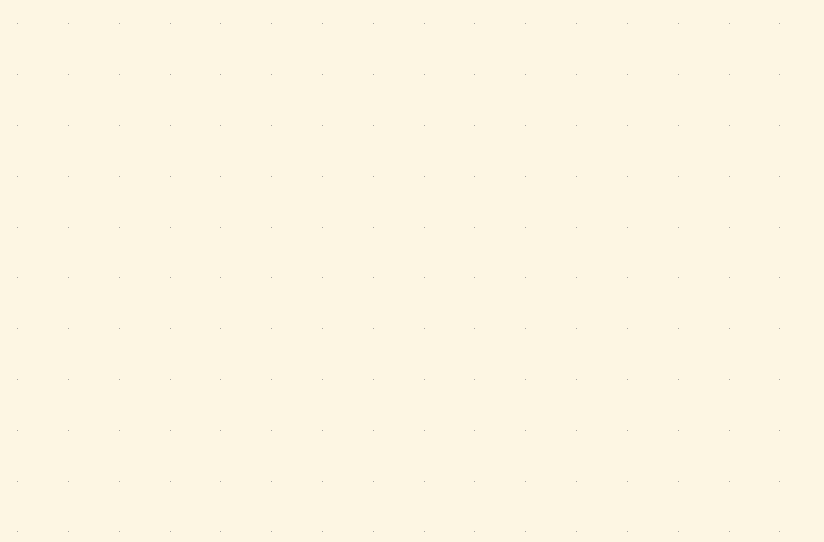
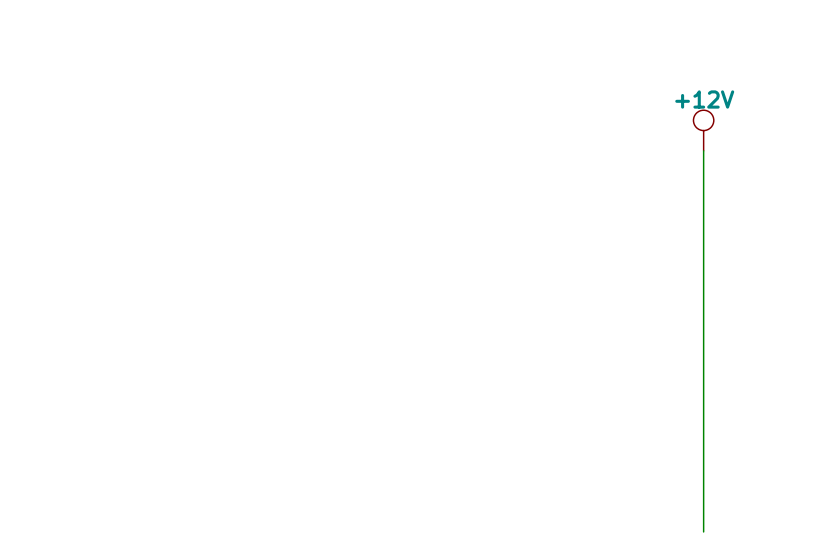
power symbol: none -> +12V (703, 130)
wire: none -> (703, 150) (703, 531)

